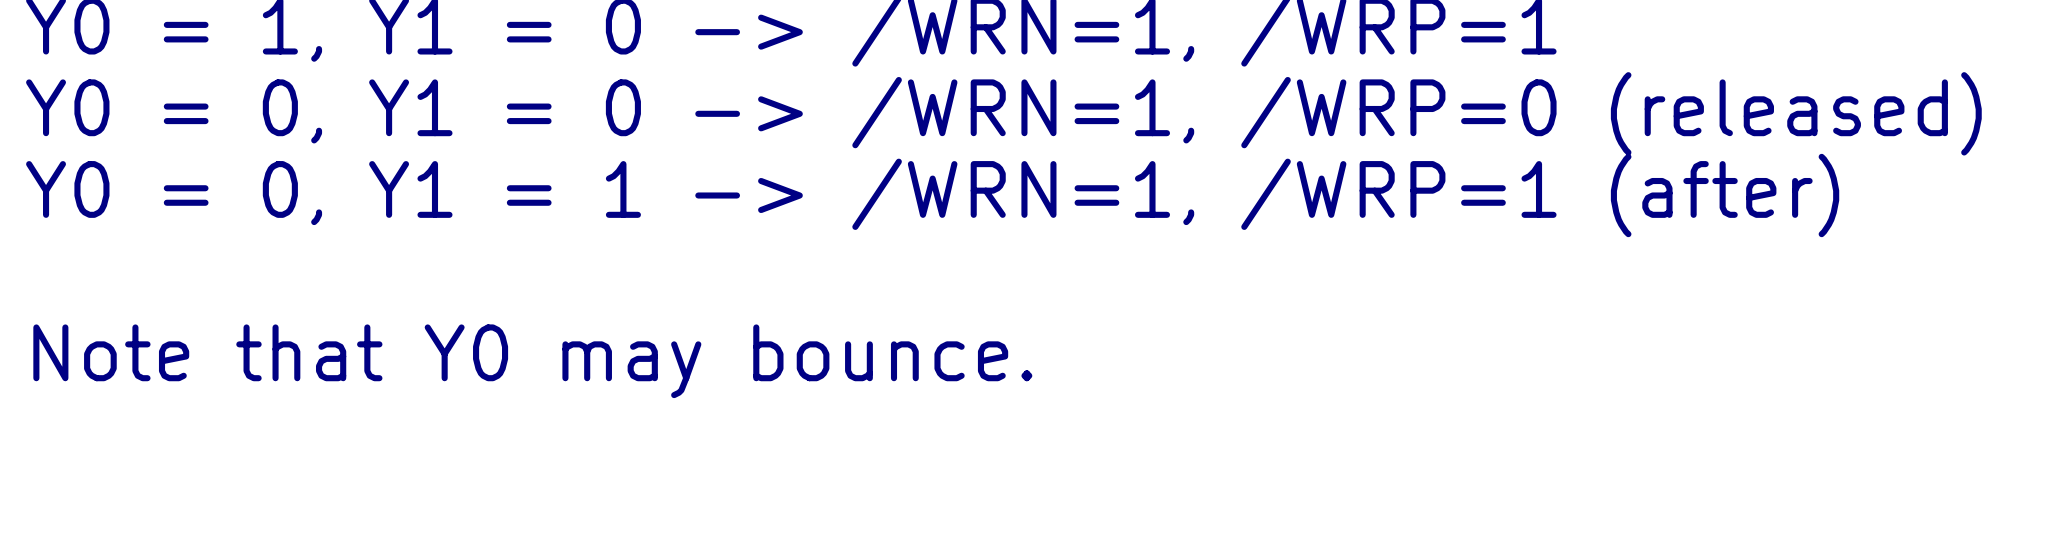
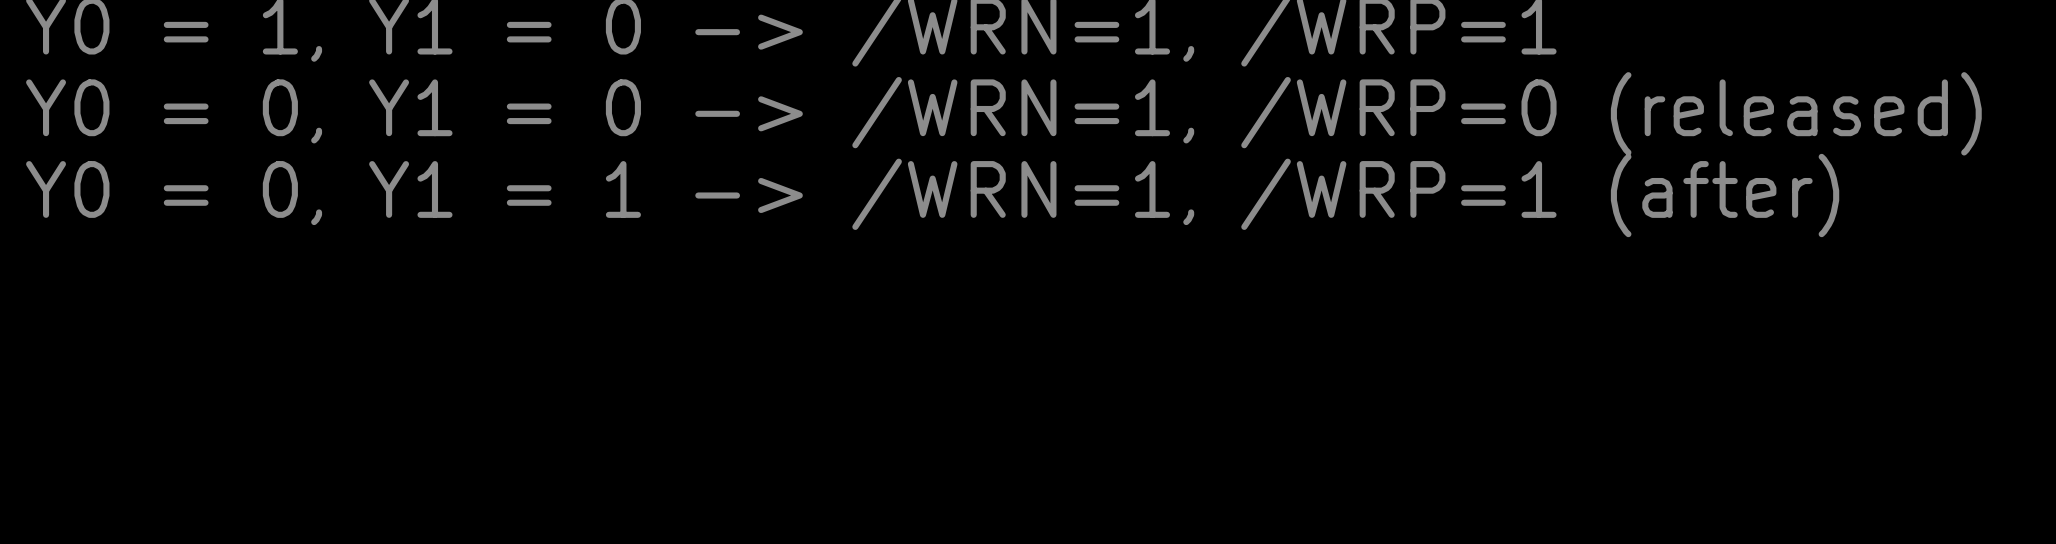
text: Note that Y0 may bounce. (532, 361) -> none

